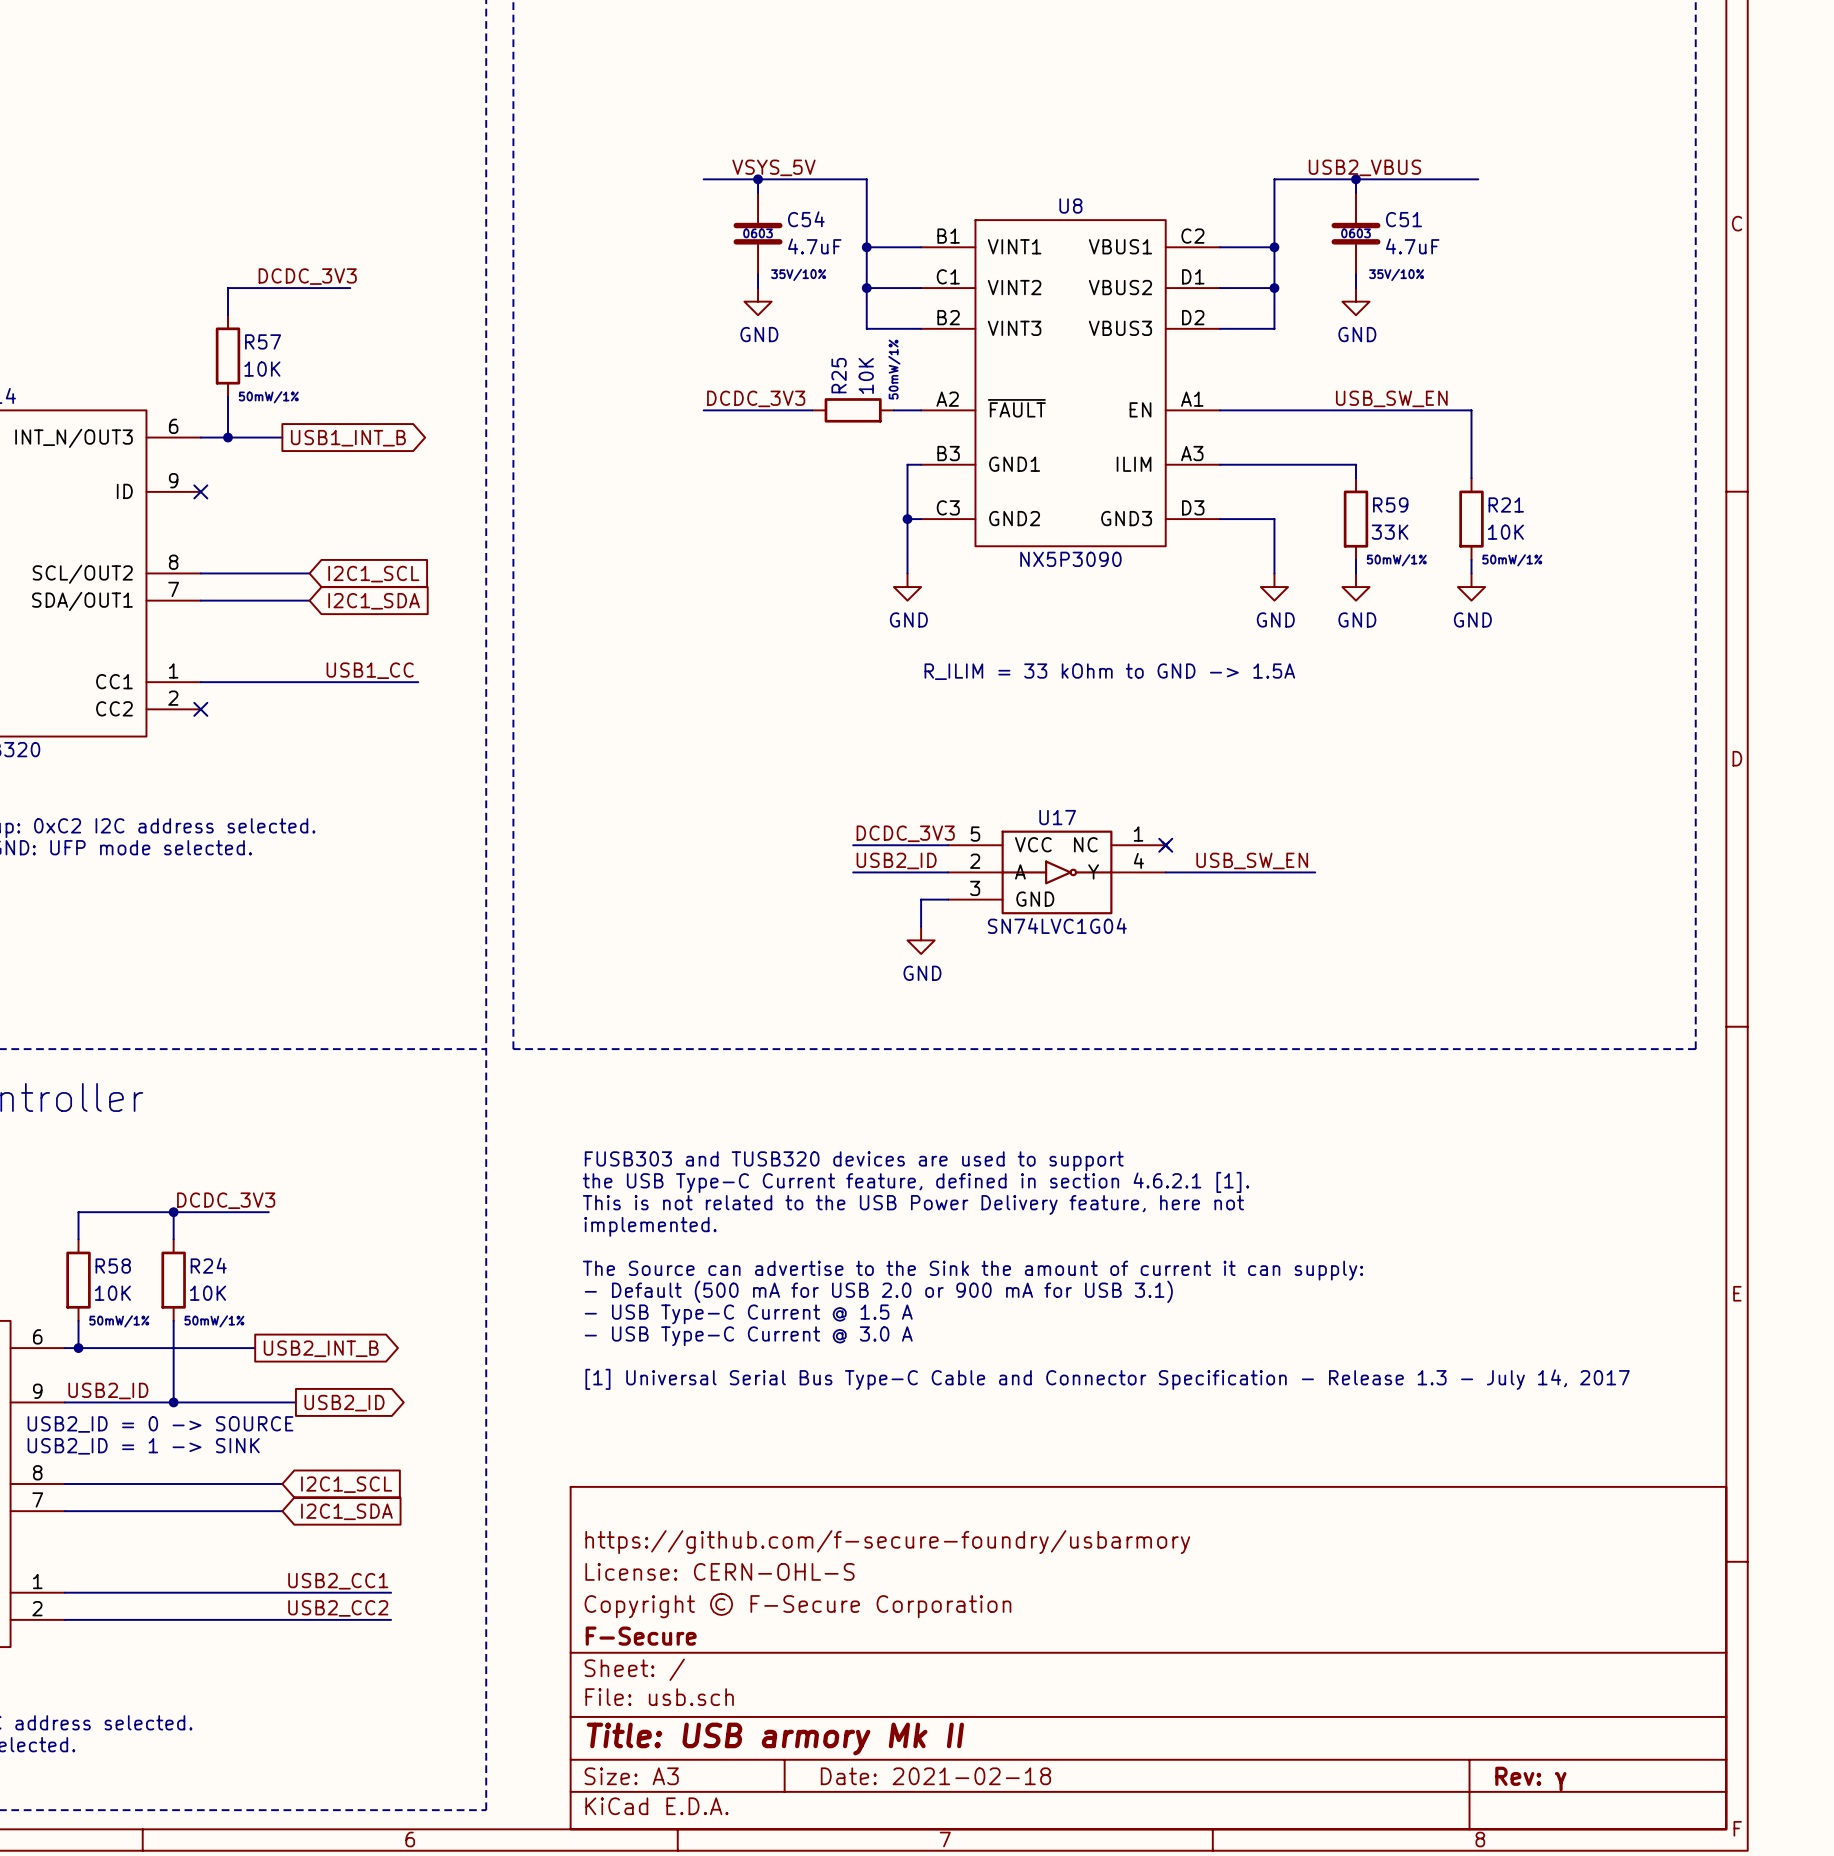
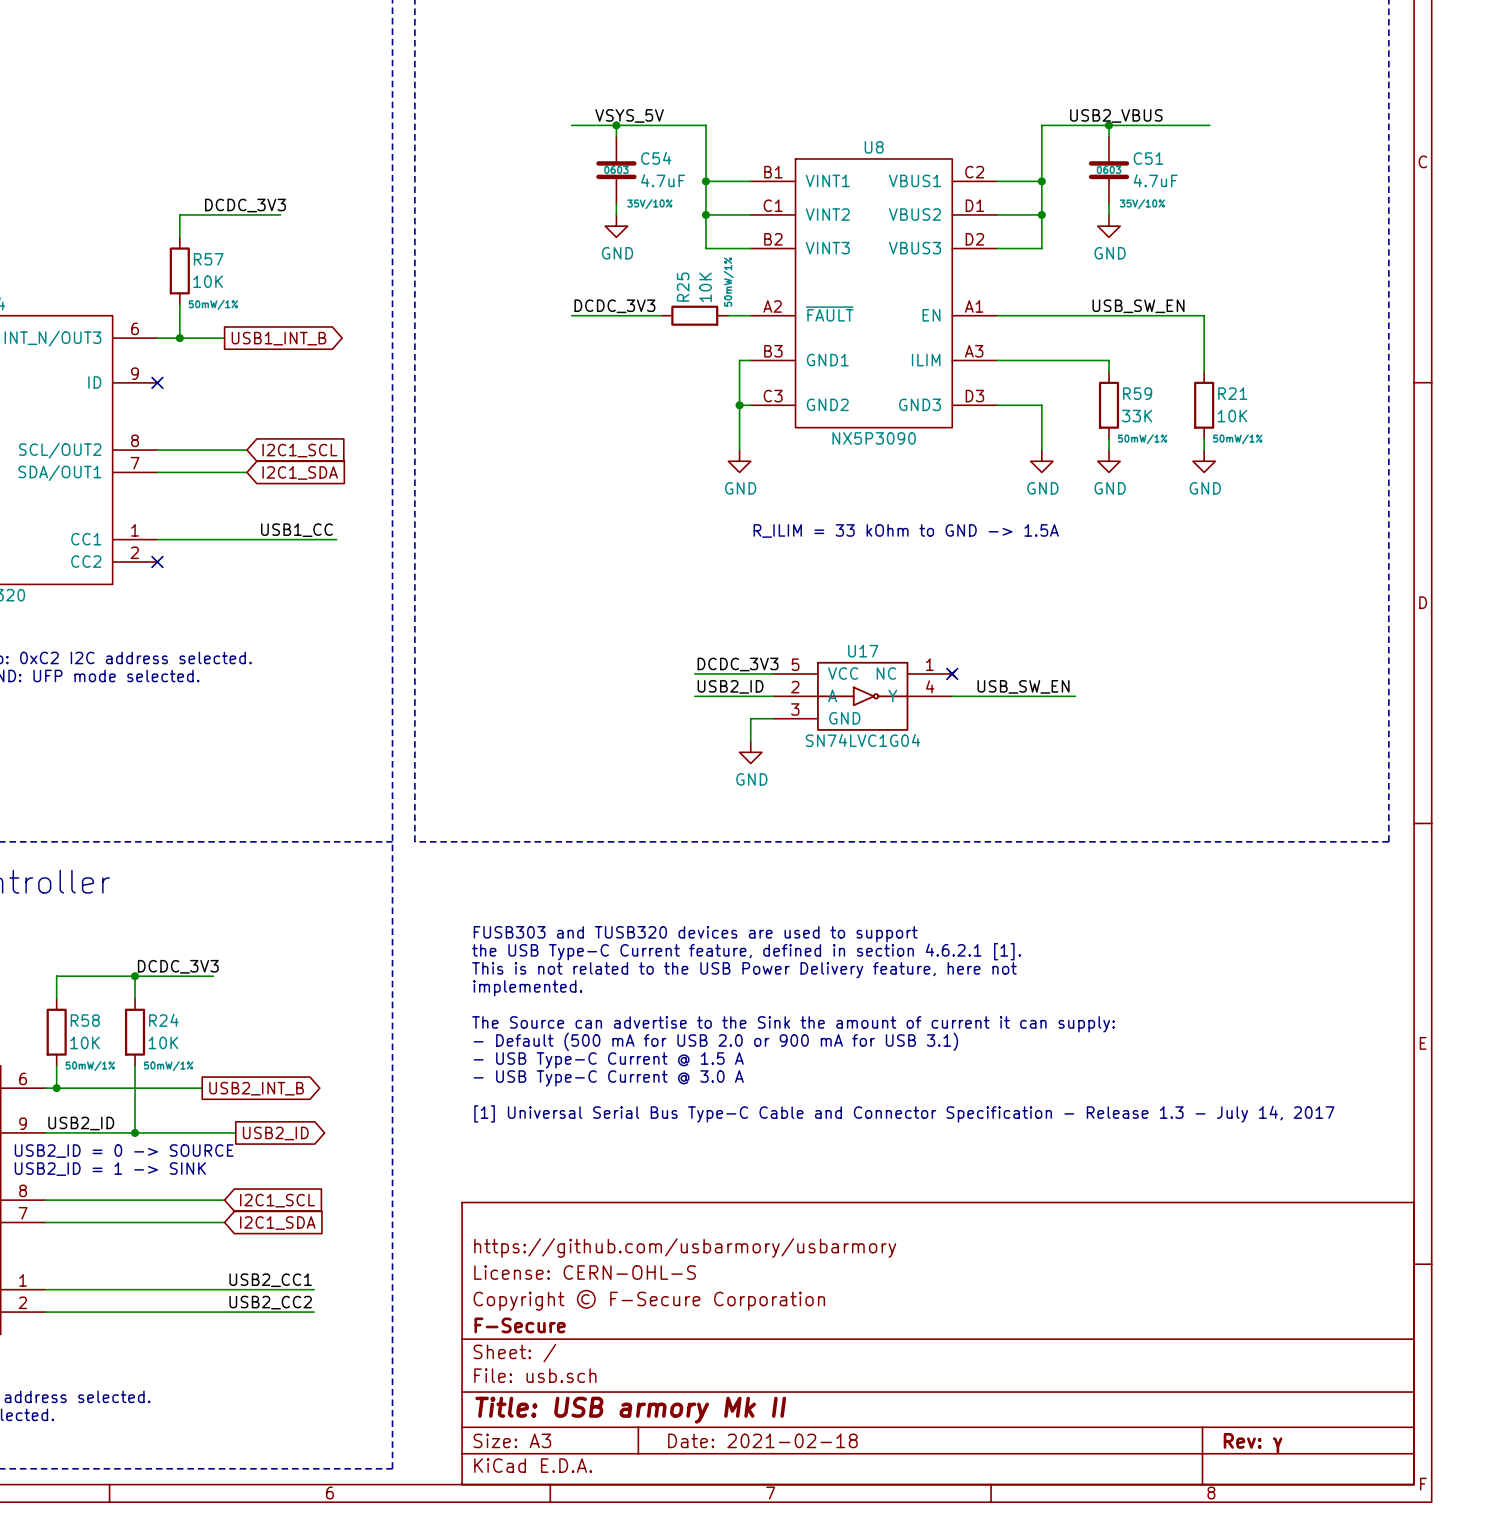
title block: https://github.com/f-secure-foundry/usbarmory (887, 1542) -> https://github.com/usbarmory/usbarmory (685, 1247)

